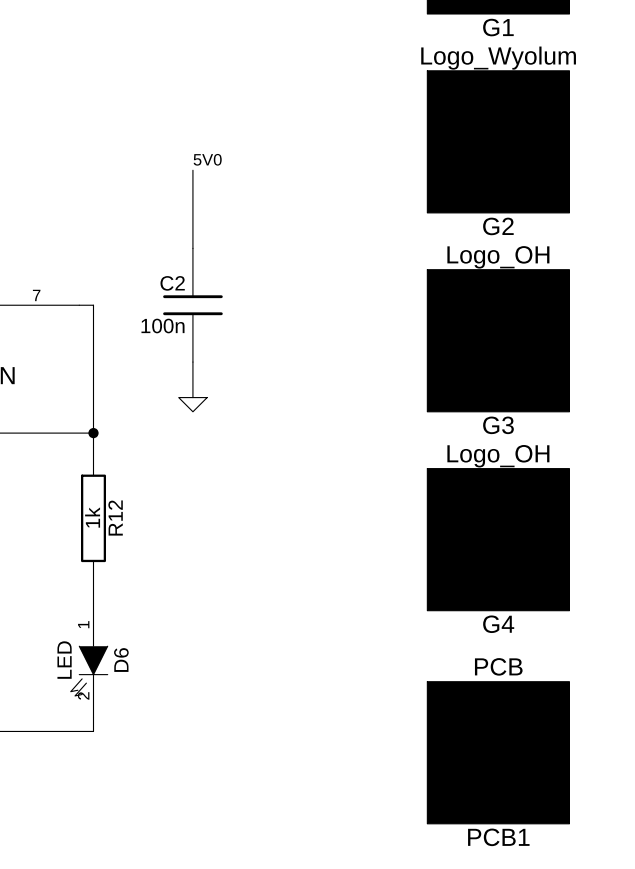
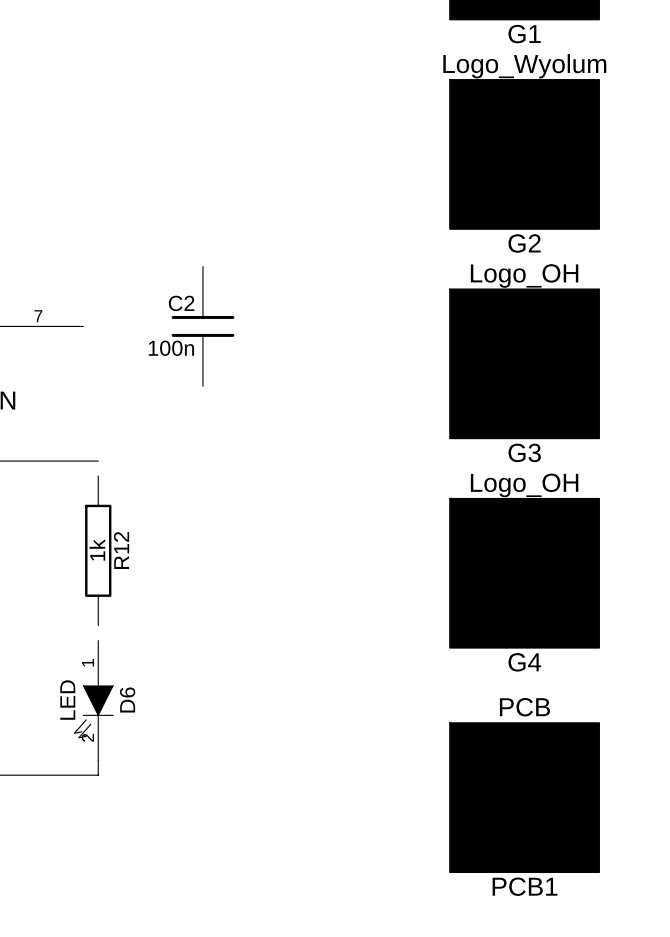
label: 5V0 (207, 159) -> none
wire: (192, 170) (192, 248) -> none
wire: (79, 305) (93, 305) (93, 447) -> none
wire: (192, 362) (192, 397) -> none
power symbol: (192, 404) -> none
junction: (93, 433) -> none
wire: (93, 589) (93, 603) -> none

